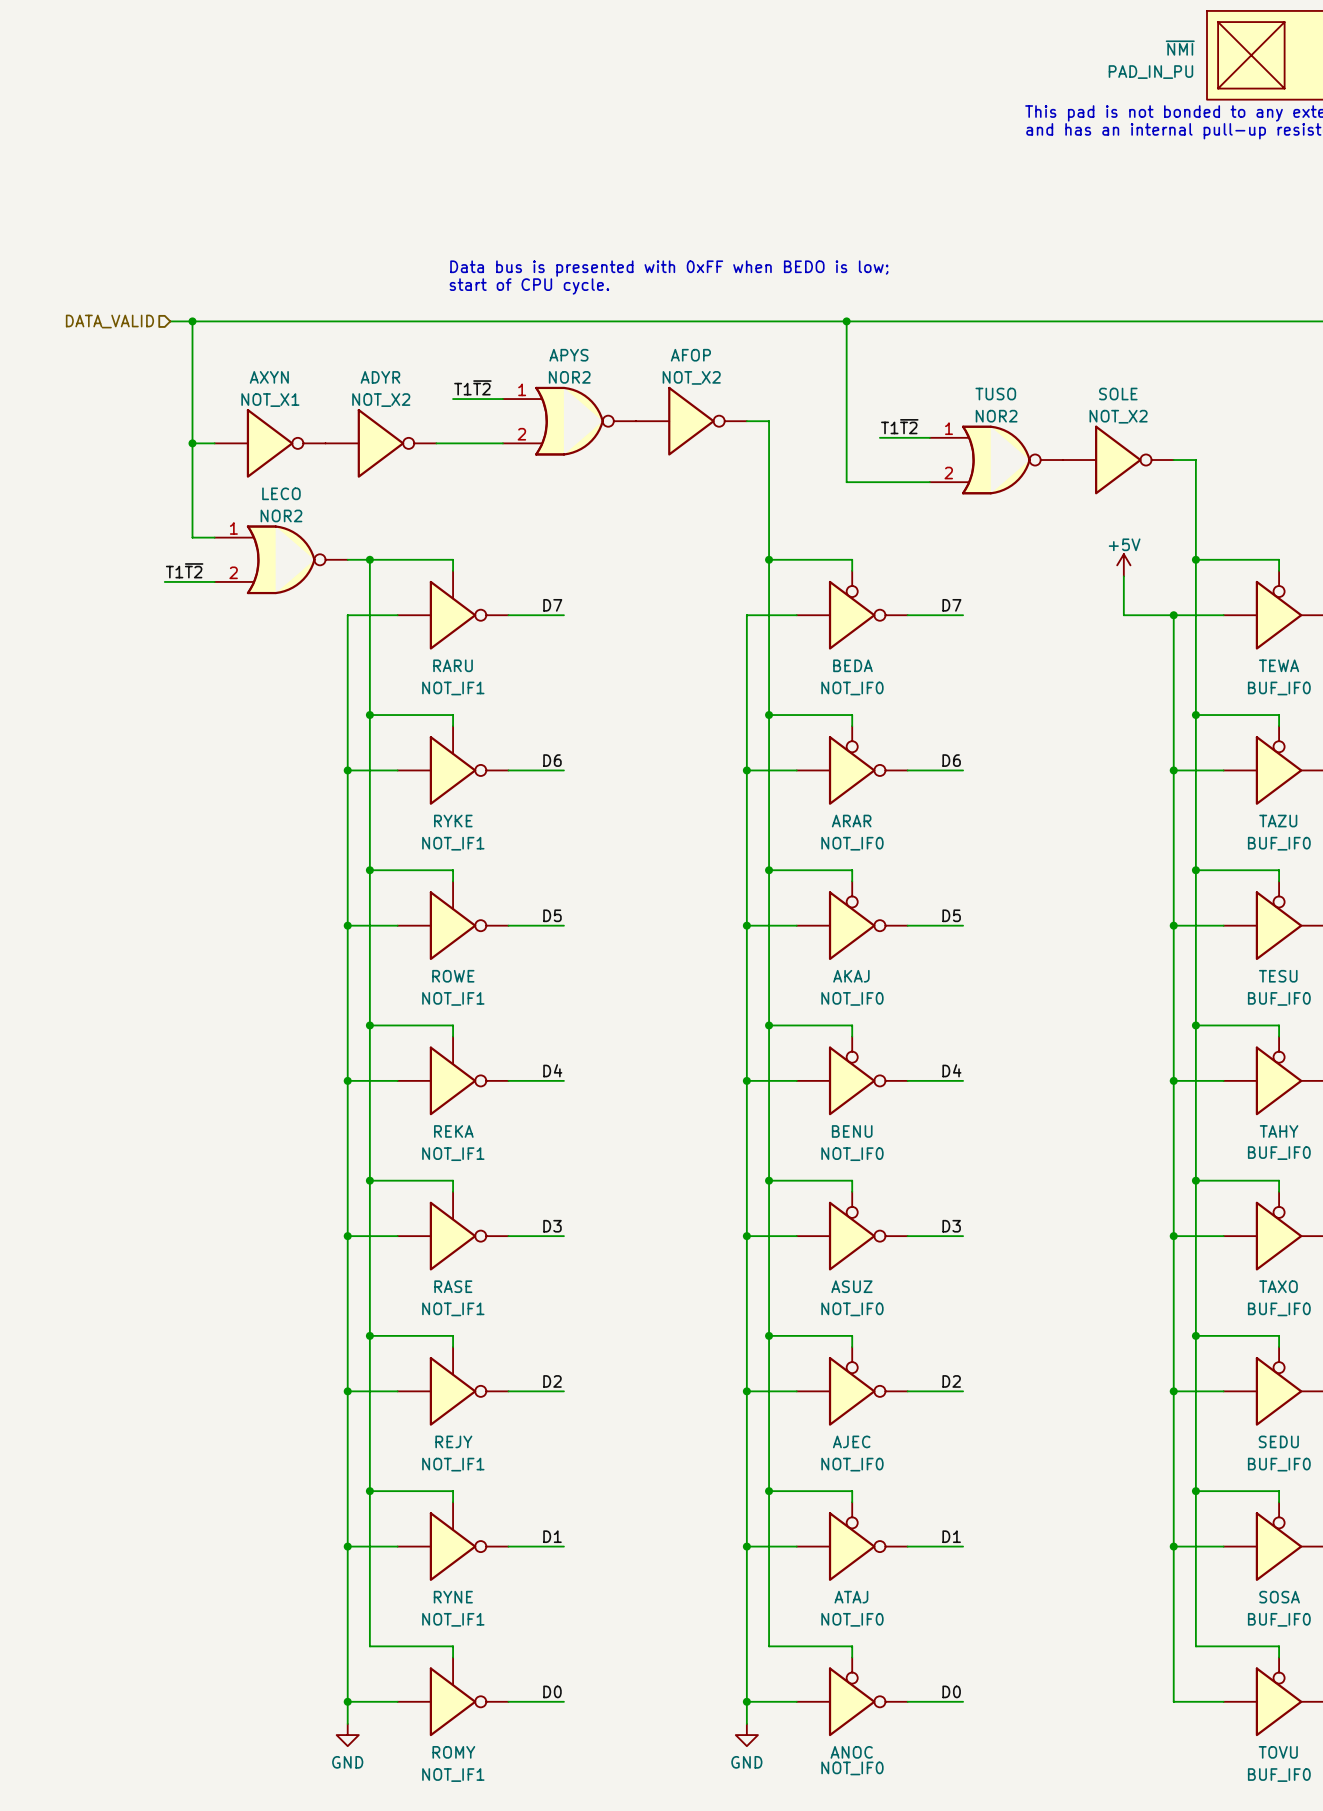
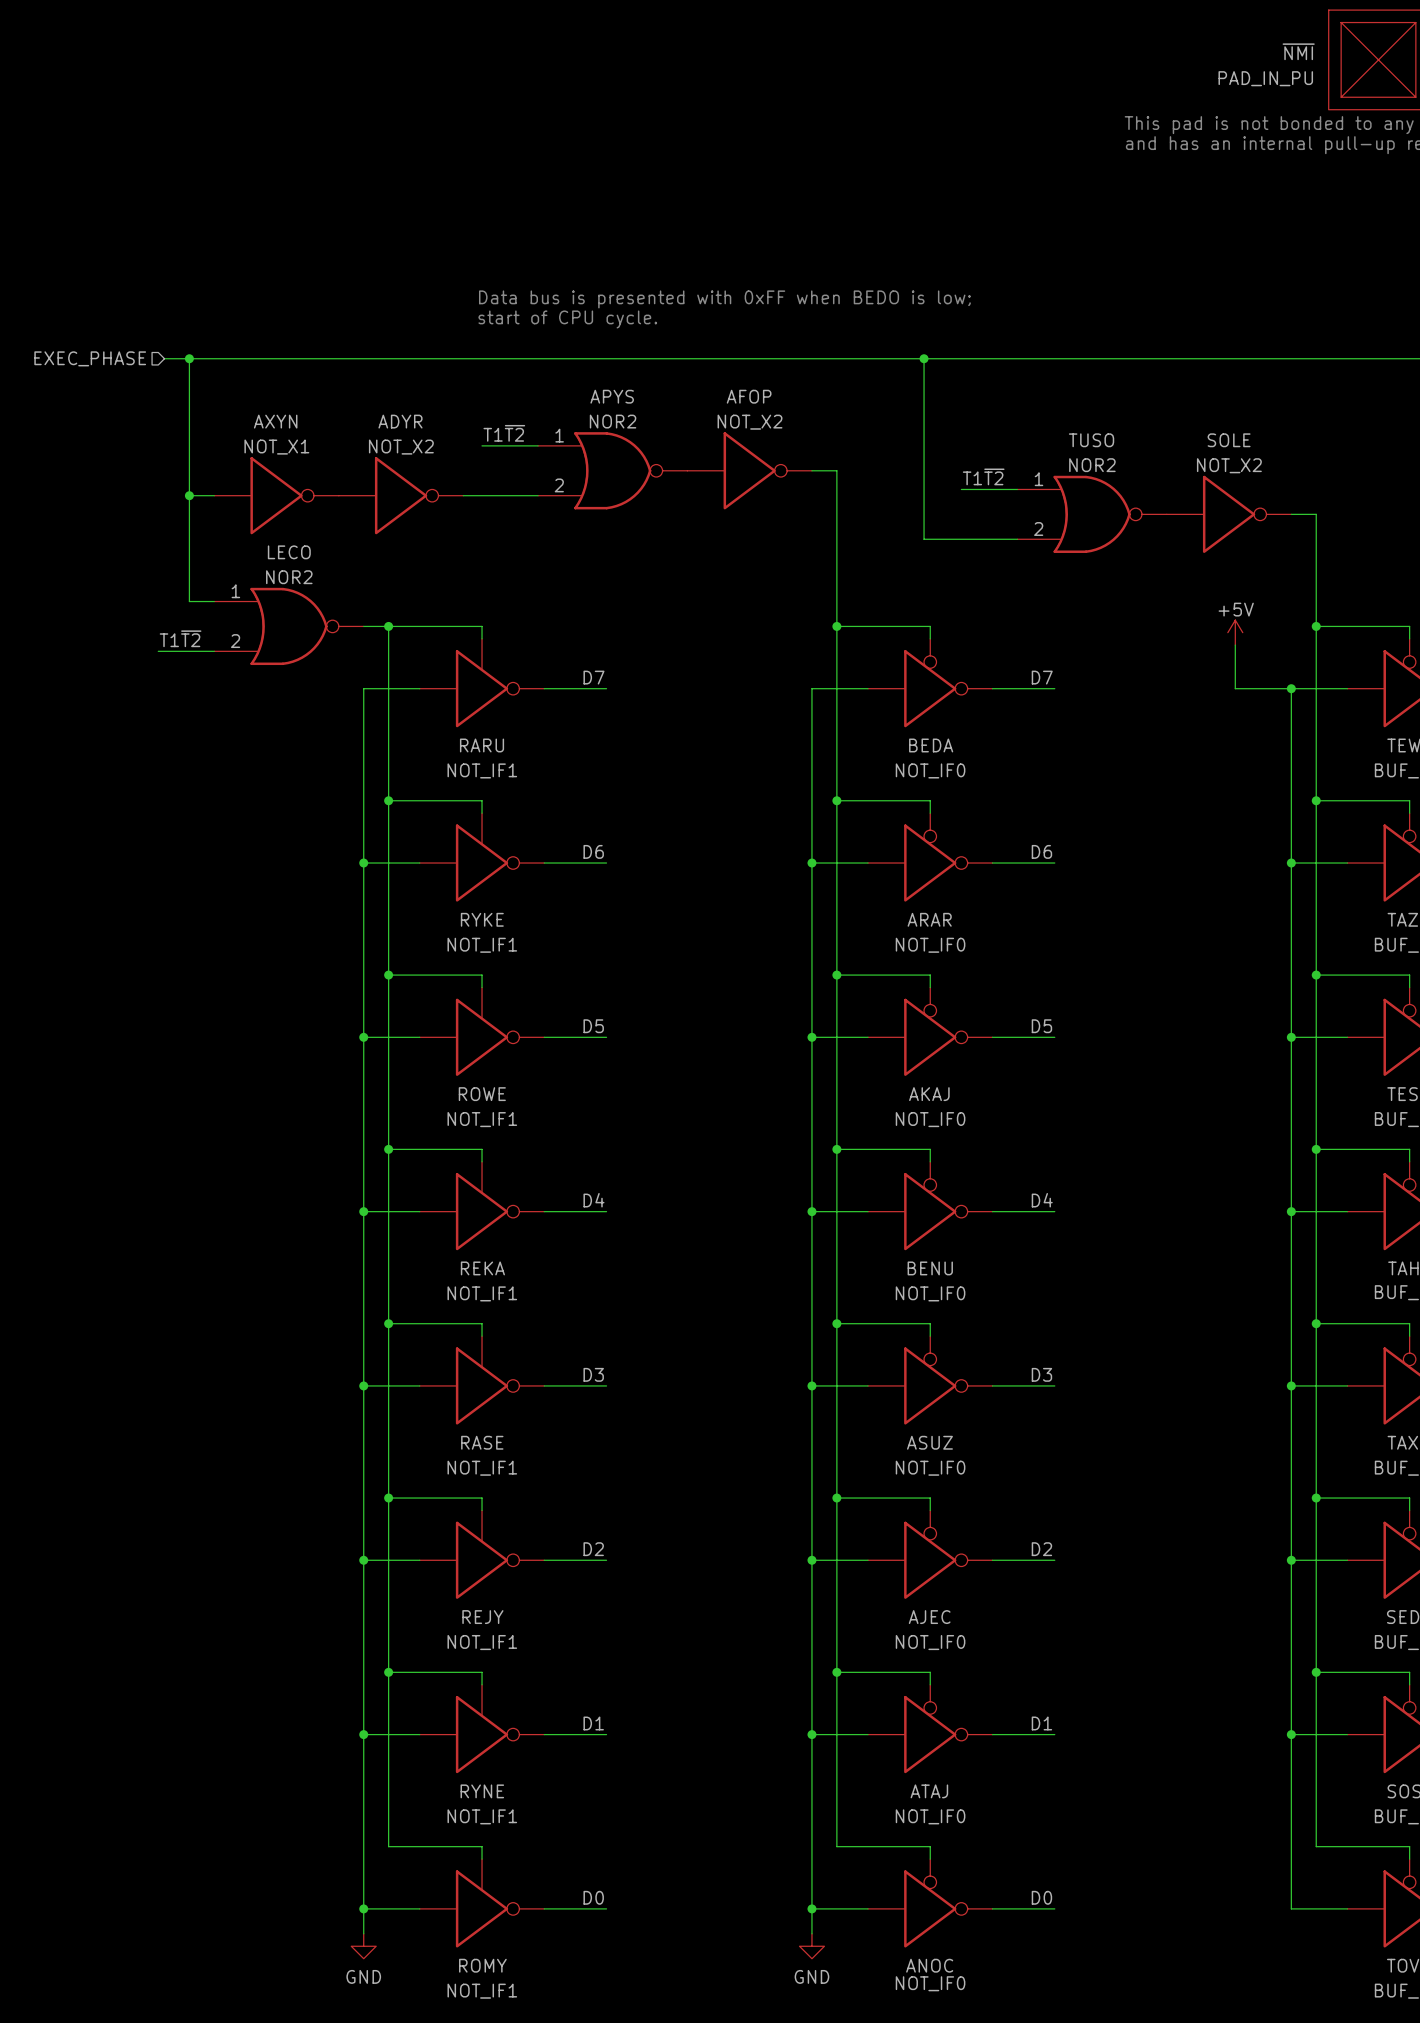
hierarchical label: DATA_VALID (109, 321) -> EXEC_PHASE (90, 358)

